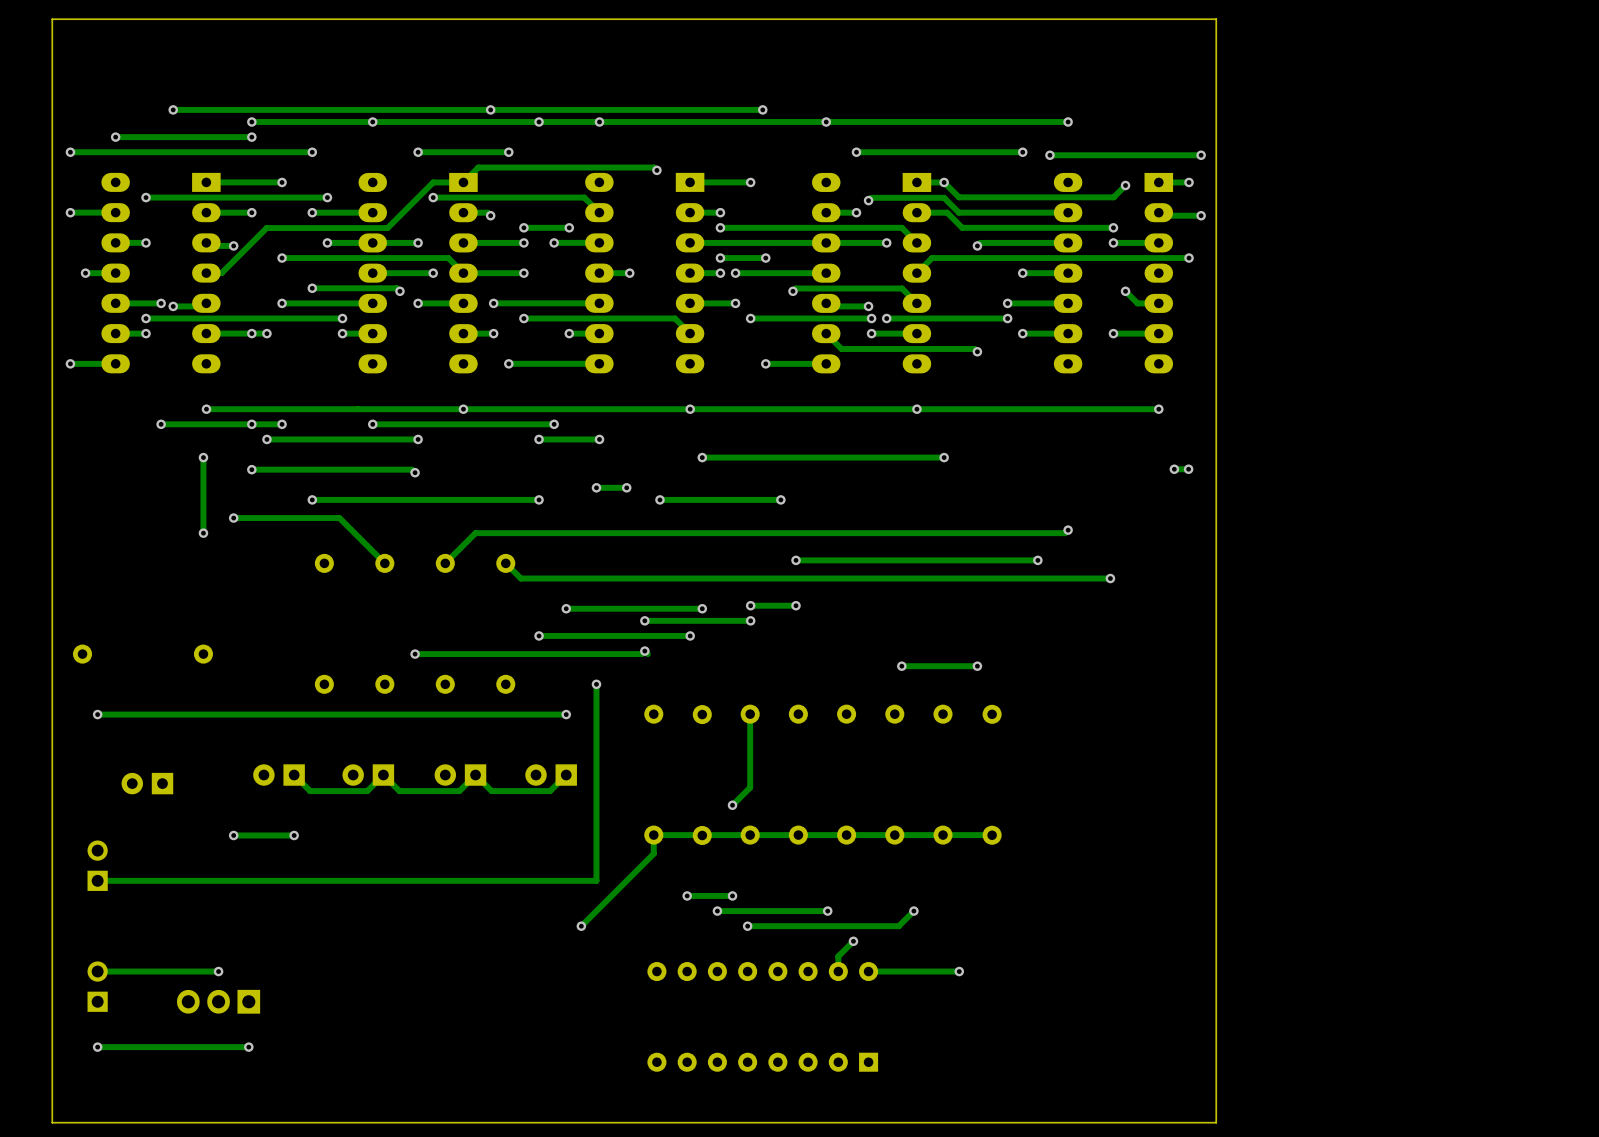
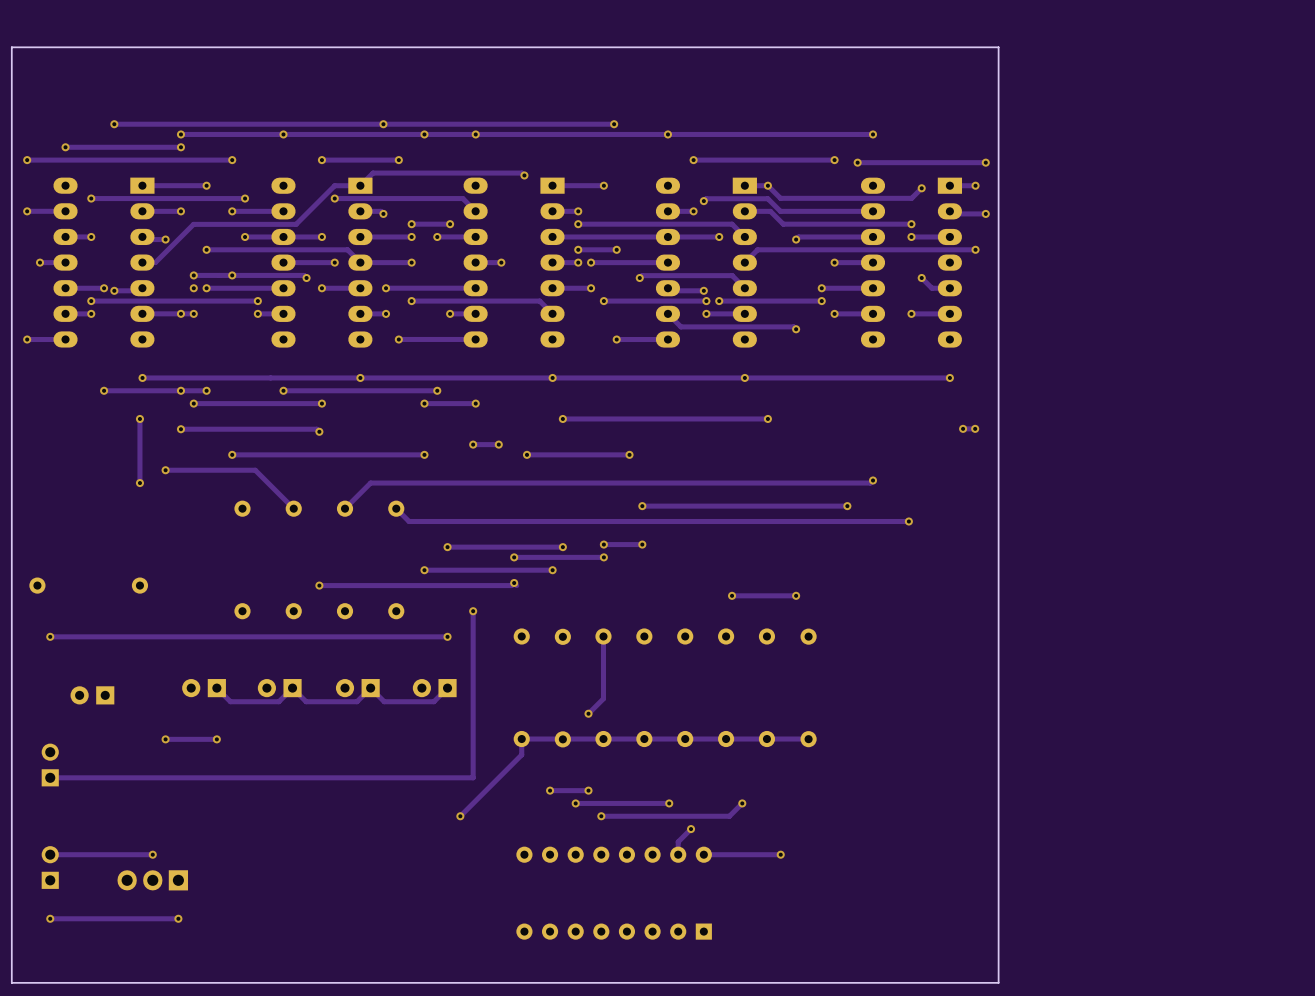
via: none -> (193, 275)
track: none -> (232, 275) (193, 275)
via: none -> (193, 288)

